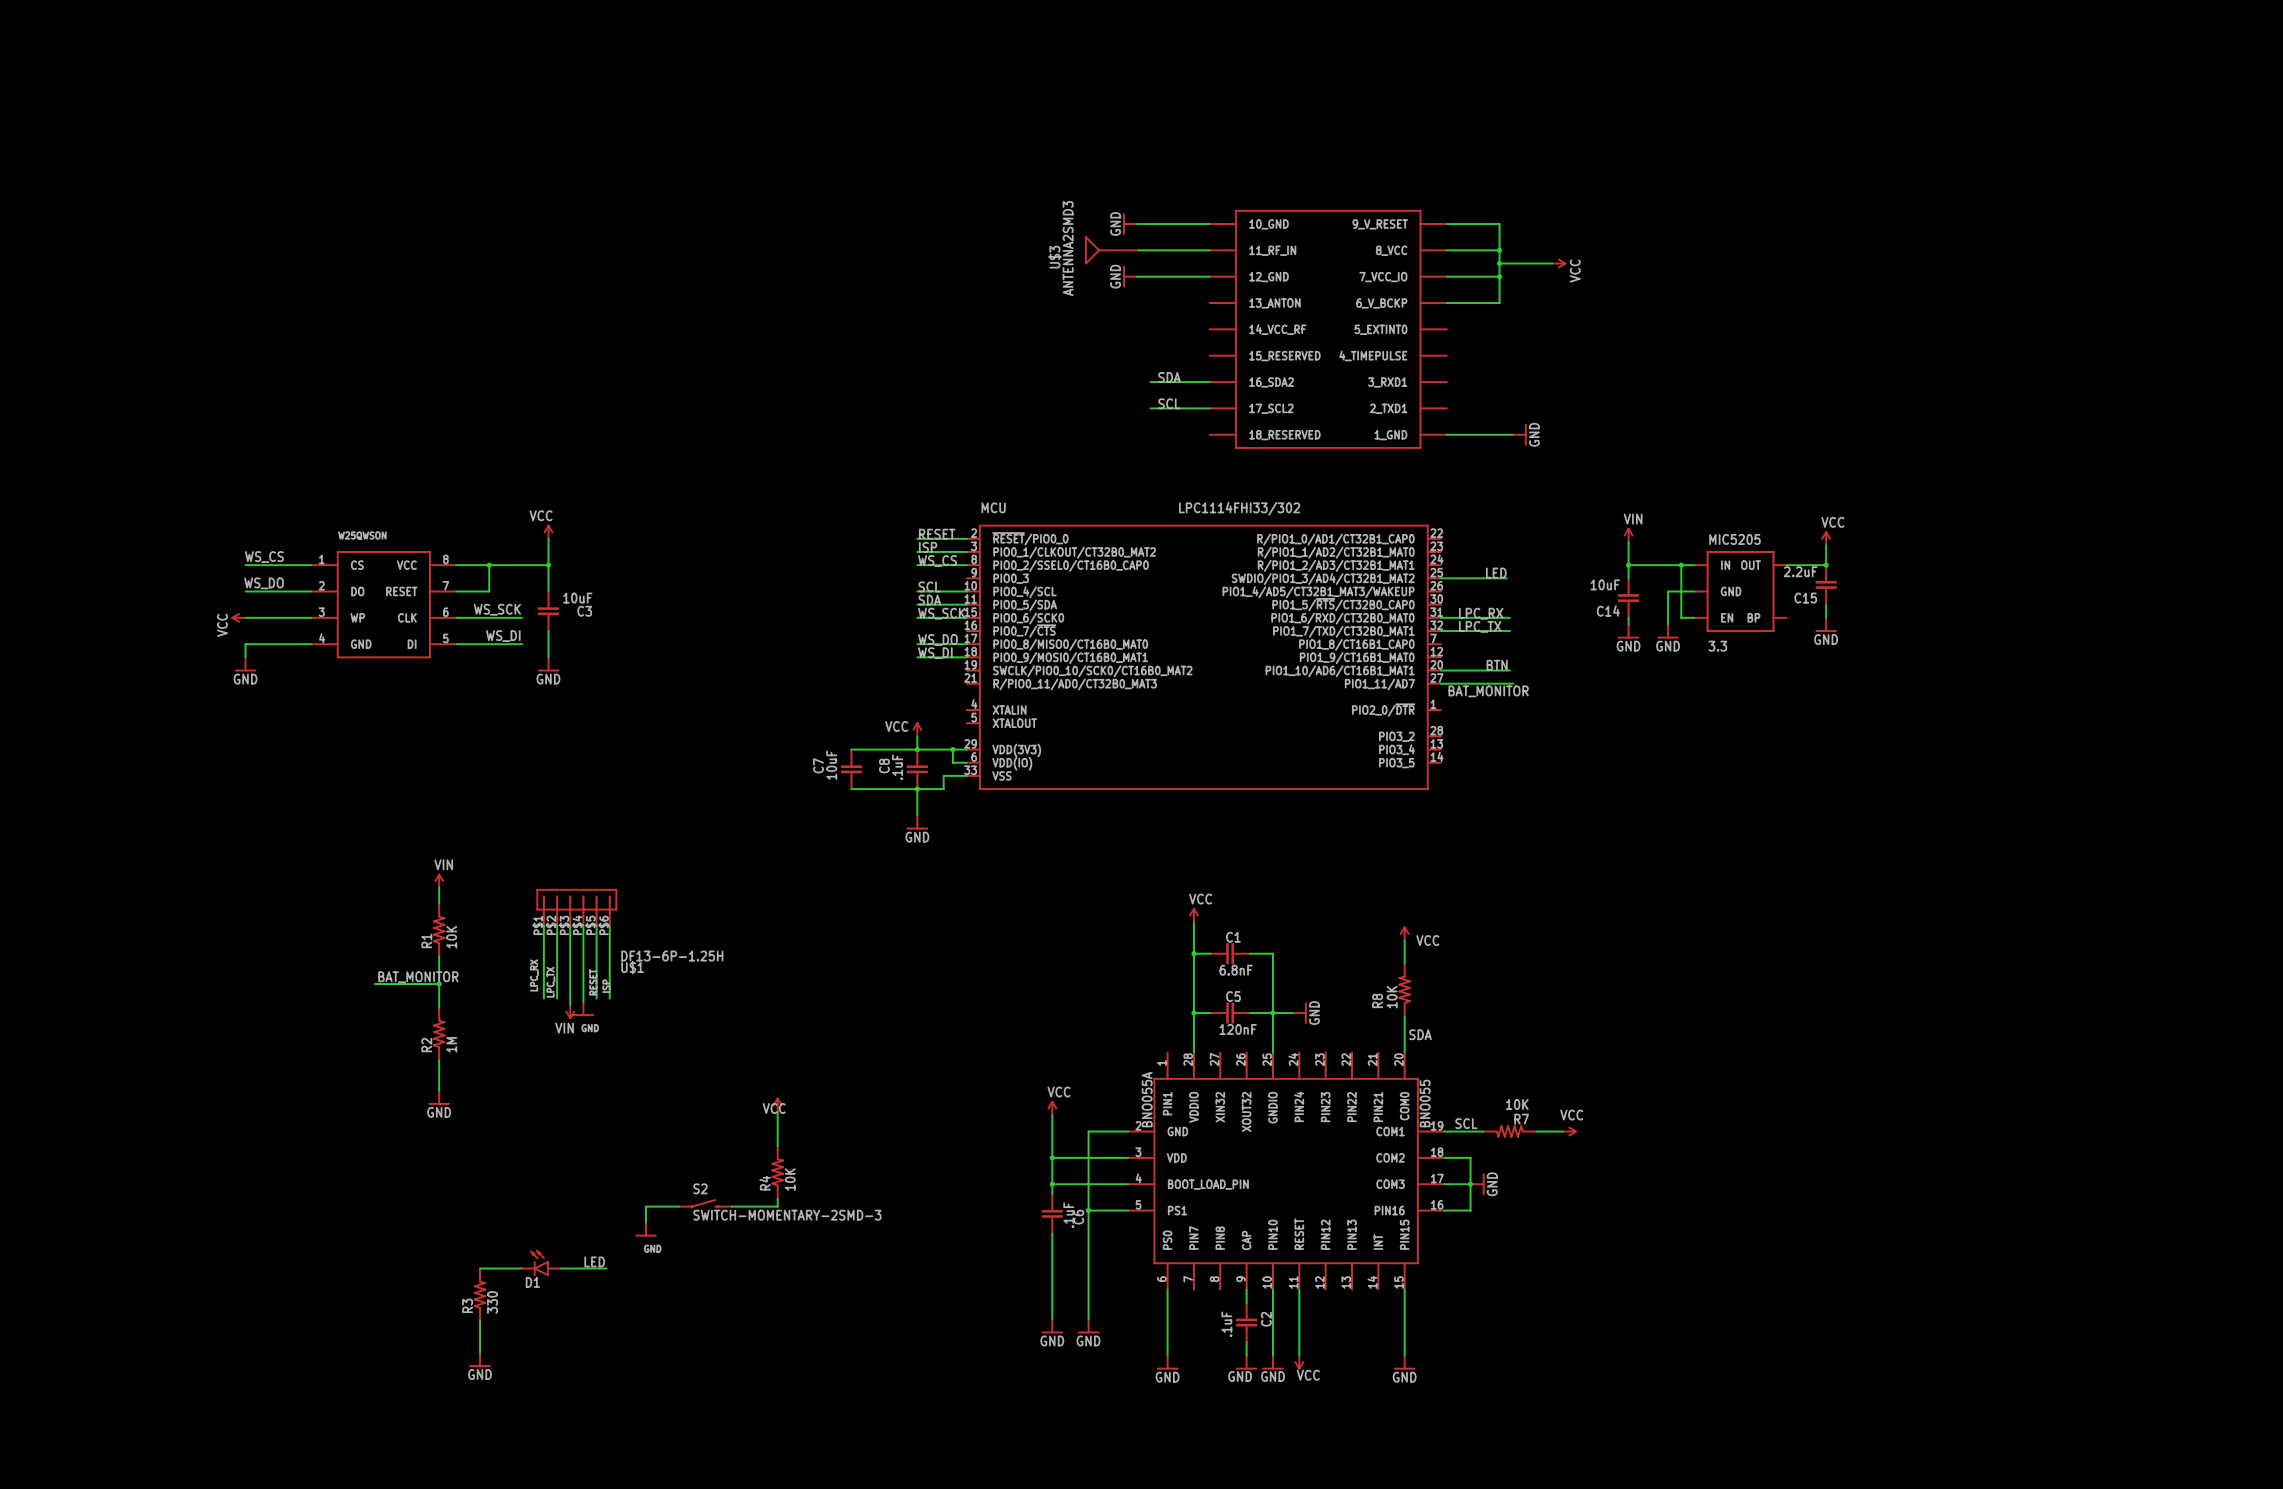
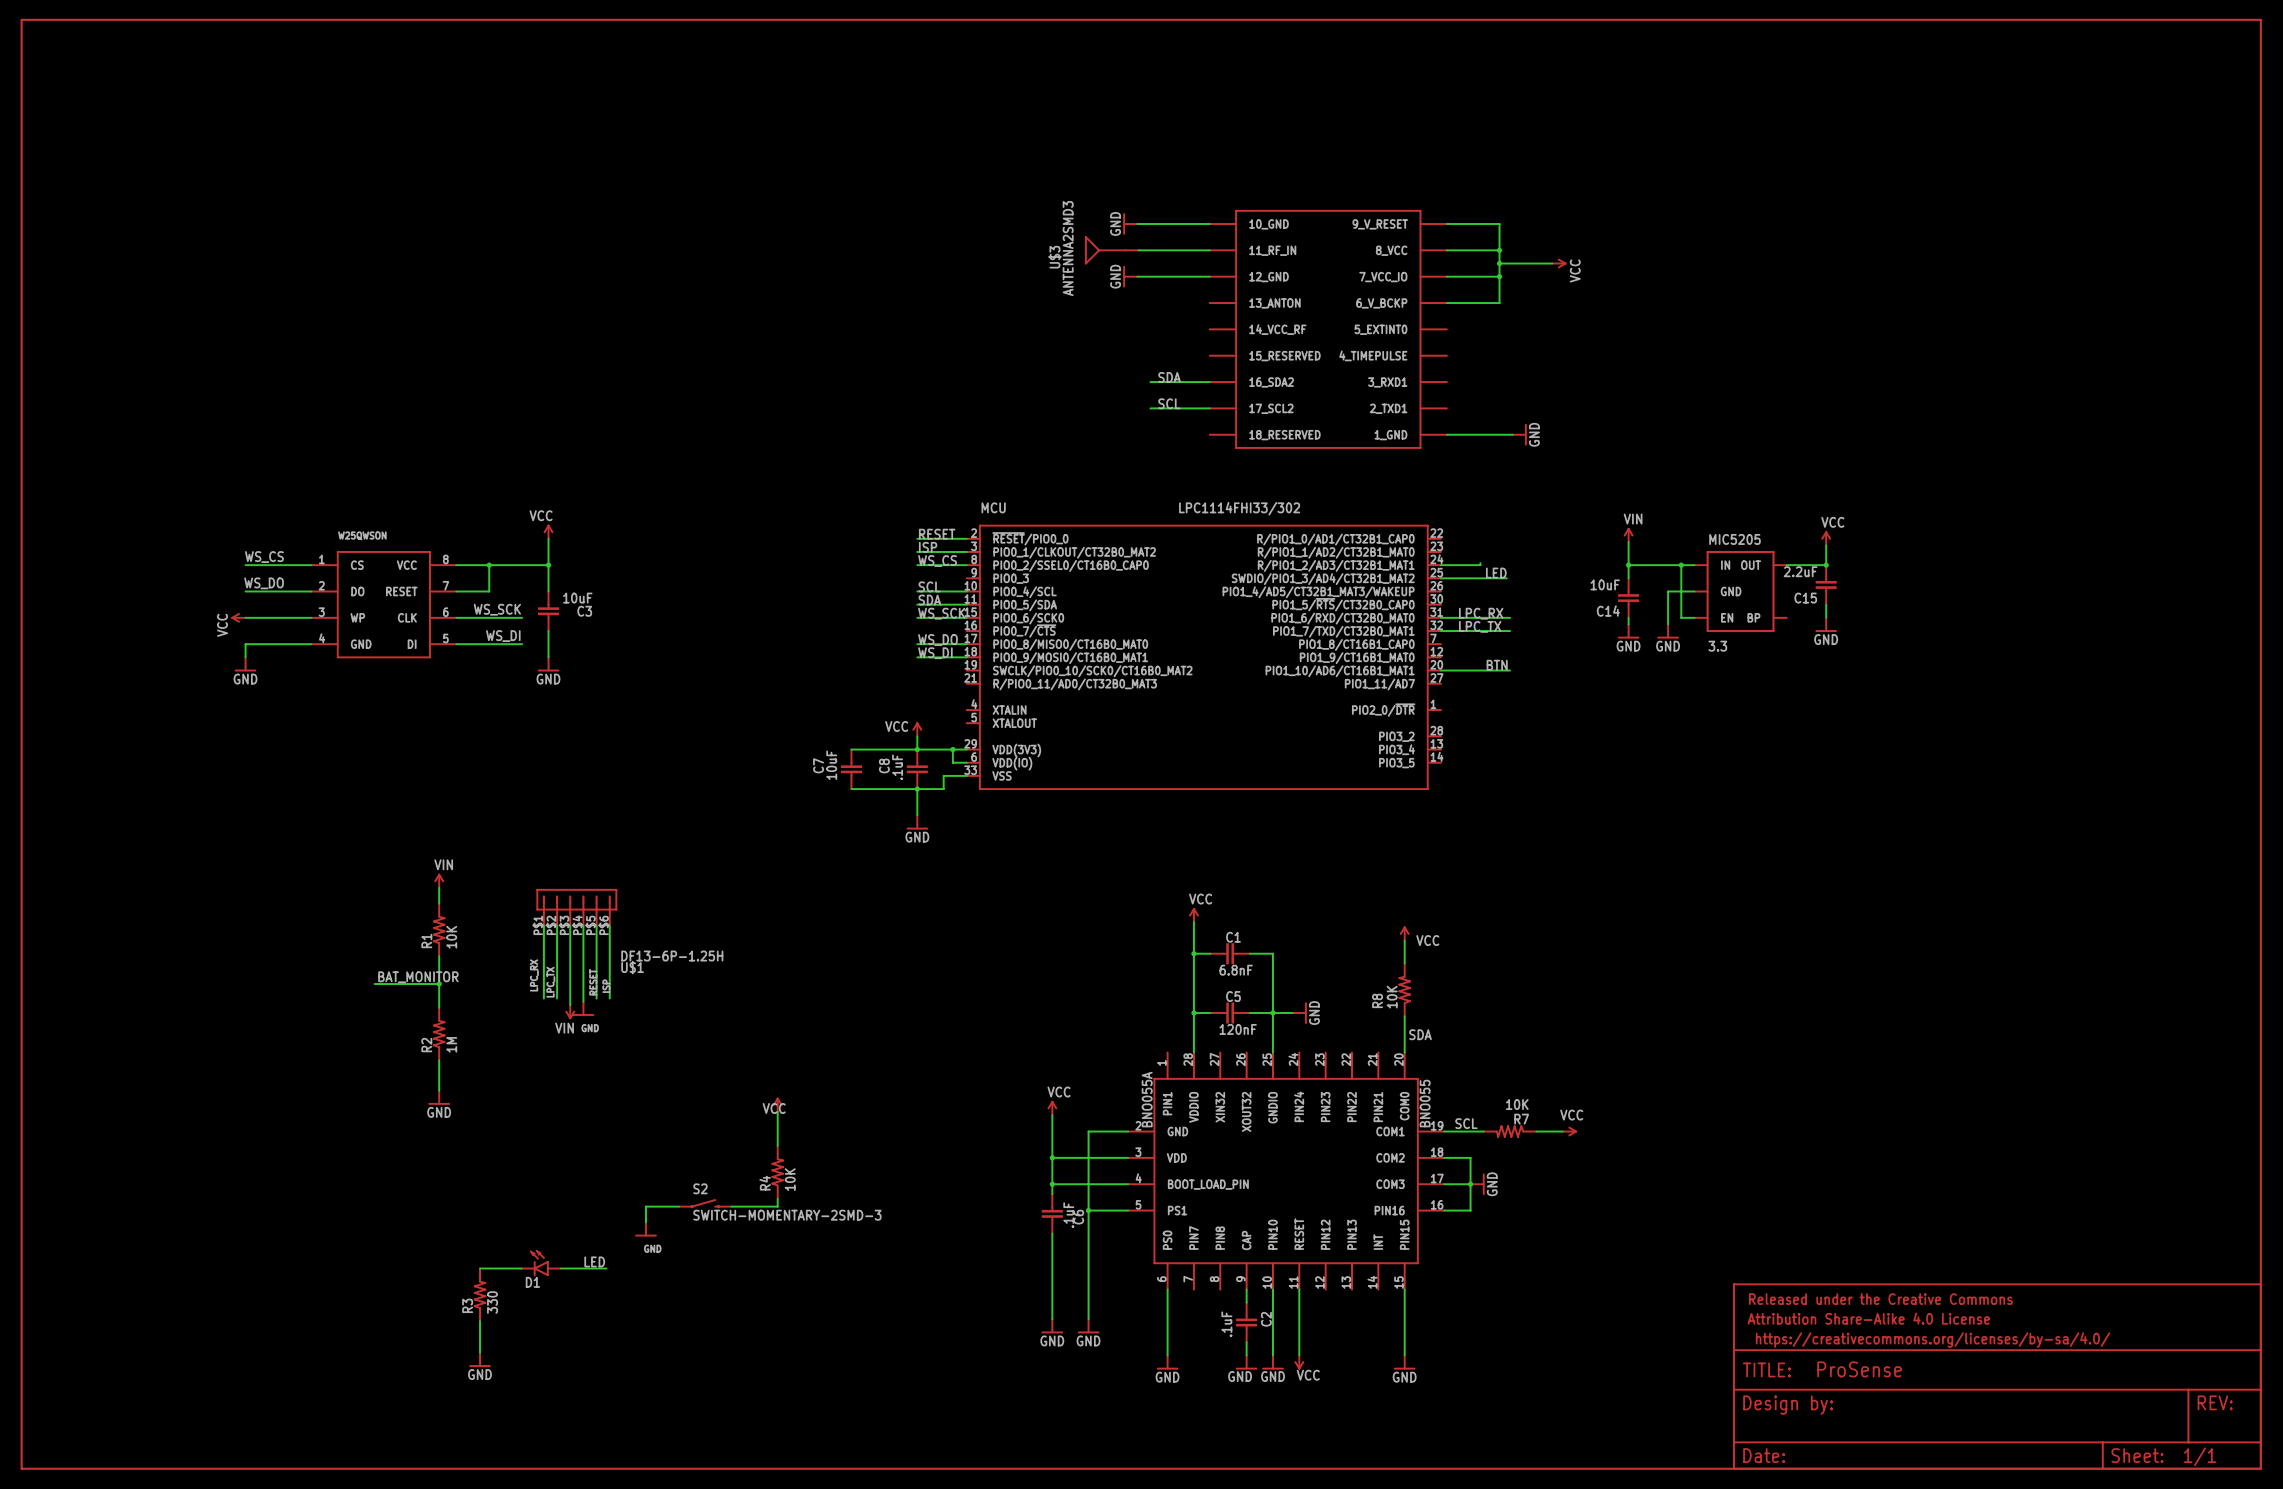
wire: none -> (1480, 563) (1480, 565) (1440, 565)
wire: (1440, 683) (1513, 683) -> none
label: BAT_MONITOR (1488, 691) -> none
part: none -> (1141, 744)
part: none -> (1997, 1376)

